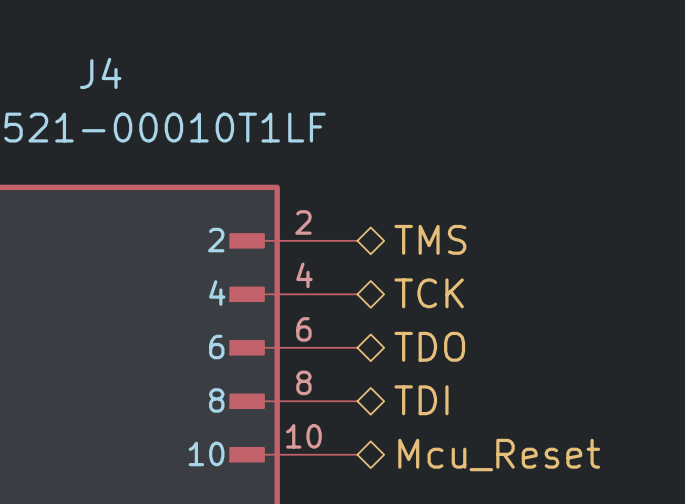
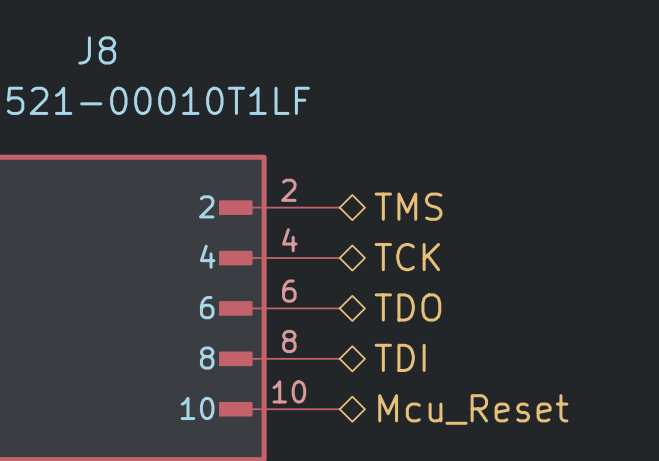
J4 name: J4 (100, 73) -> J8 (97, 50)

